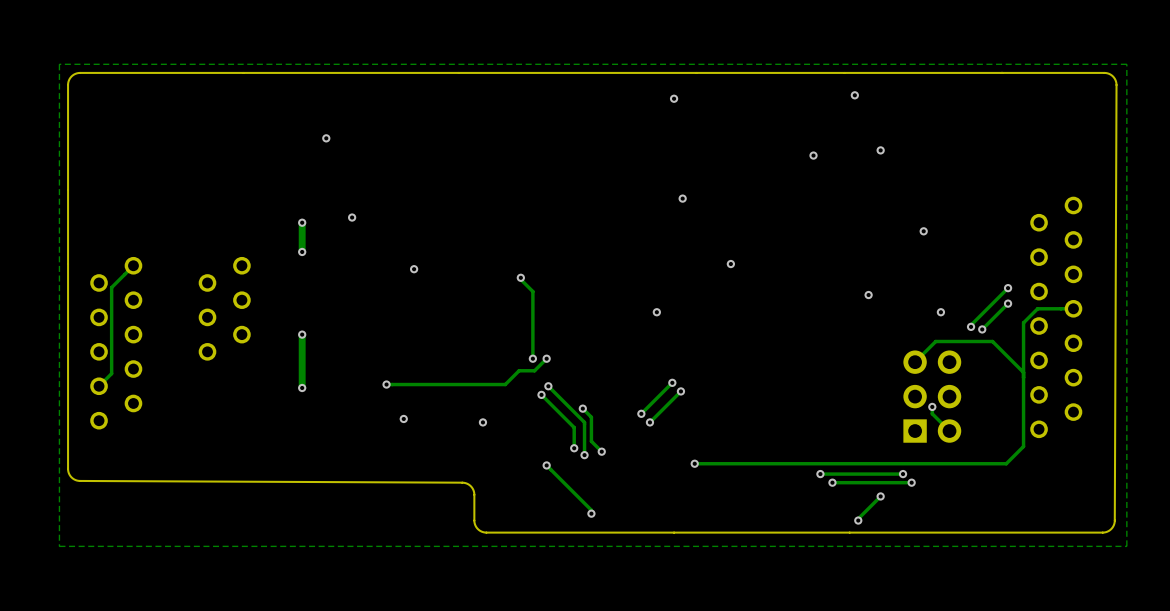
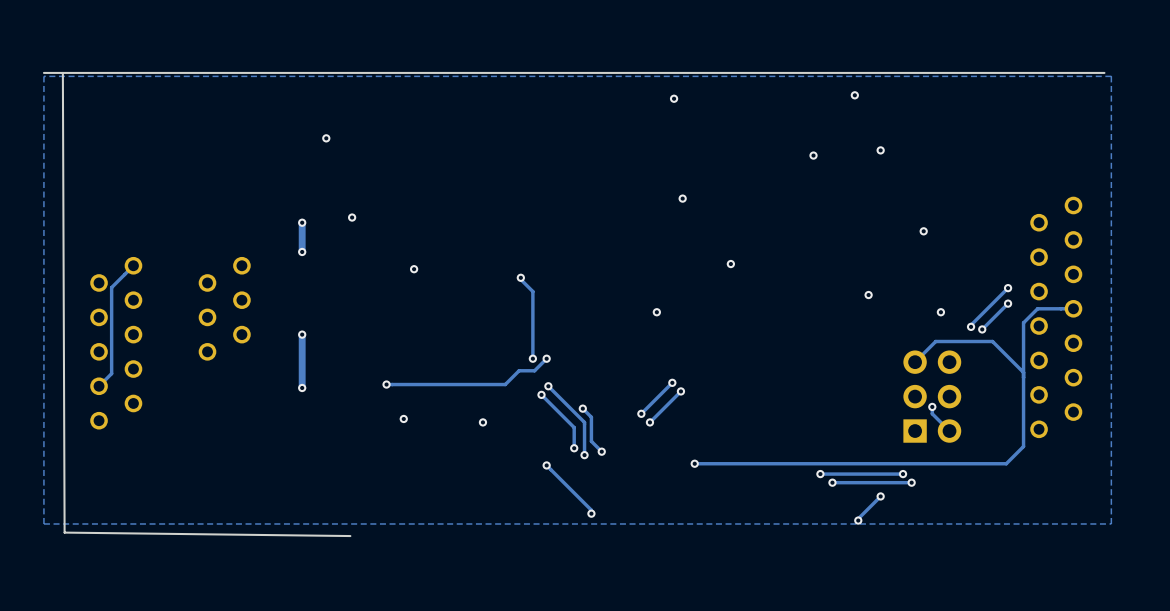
zone outline: (1126, 64) (59, 64) (59, 546) (1126, 546) (1126, 64) -> (1111, 76) (1111, 523) (43, 523) (43, 76) (1111, 76)
board edge: none -> (62, 72) (64, 532) (350, 536)
board edge: (1104, 72) (1112, 76) (1116, 84) (1114, 520) (1111, 529) (1102, 532) (486, 532) (479, 530) (475, 525) (473, 491) (469, 485) (463, 482) (75, 480) (70, 476) (68, 468) (68, 84) (71, 76) (80, 72) -> (43, 72) (80, 72)

